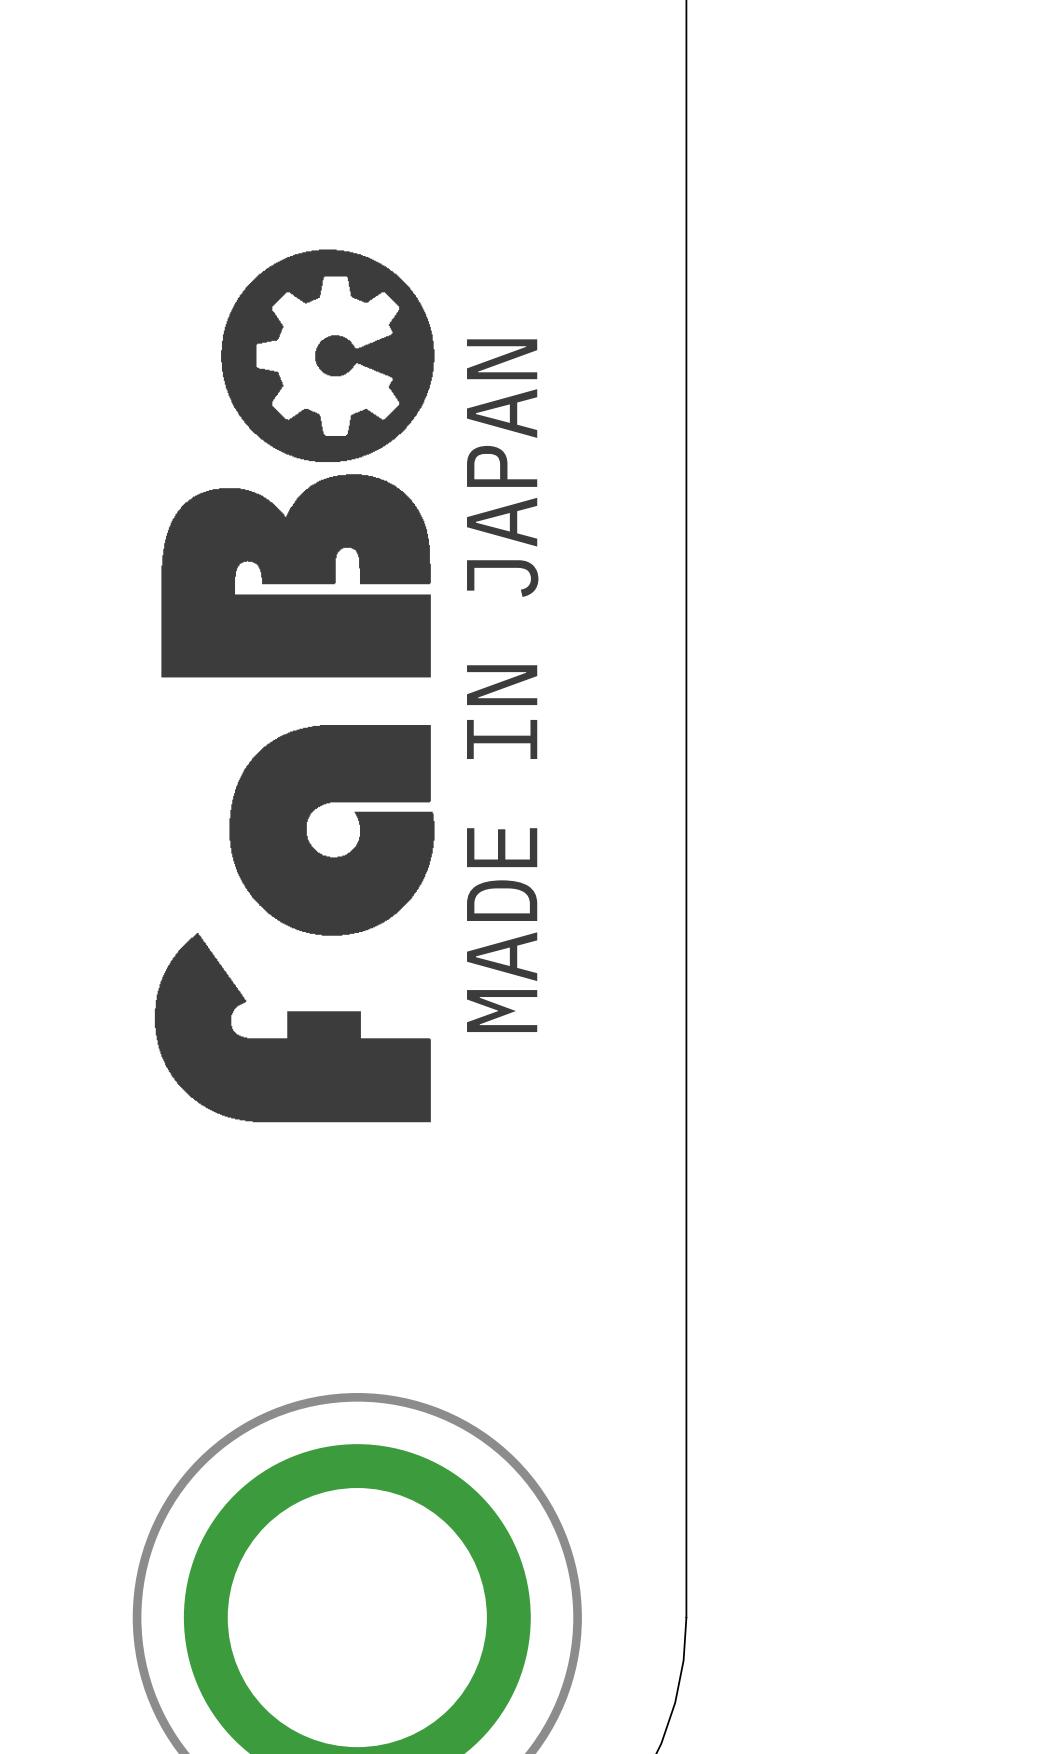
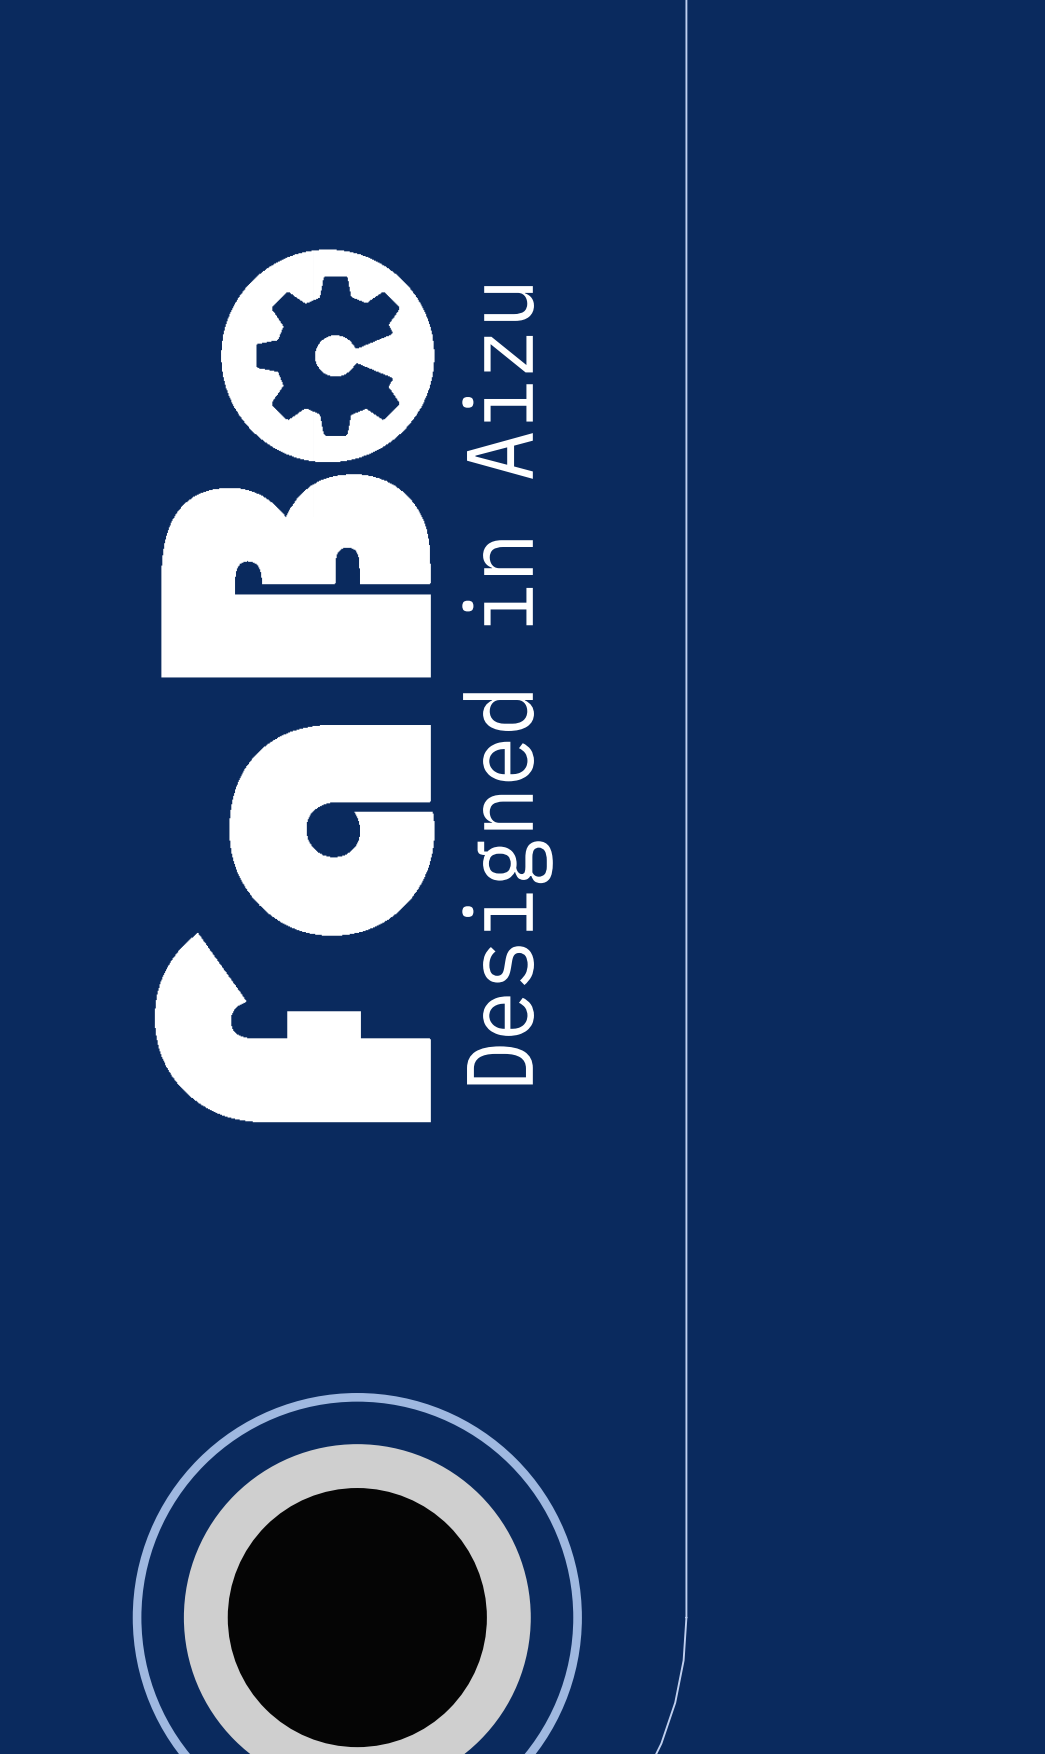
text: MADE IN JAPAN (502, 685) -> Designed in Aizu (507, 685)

